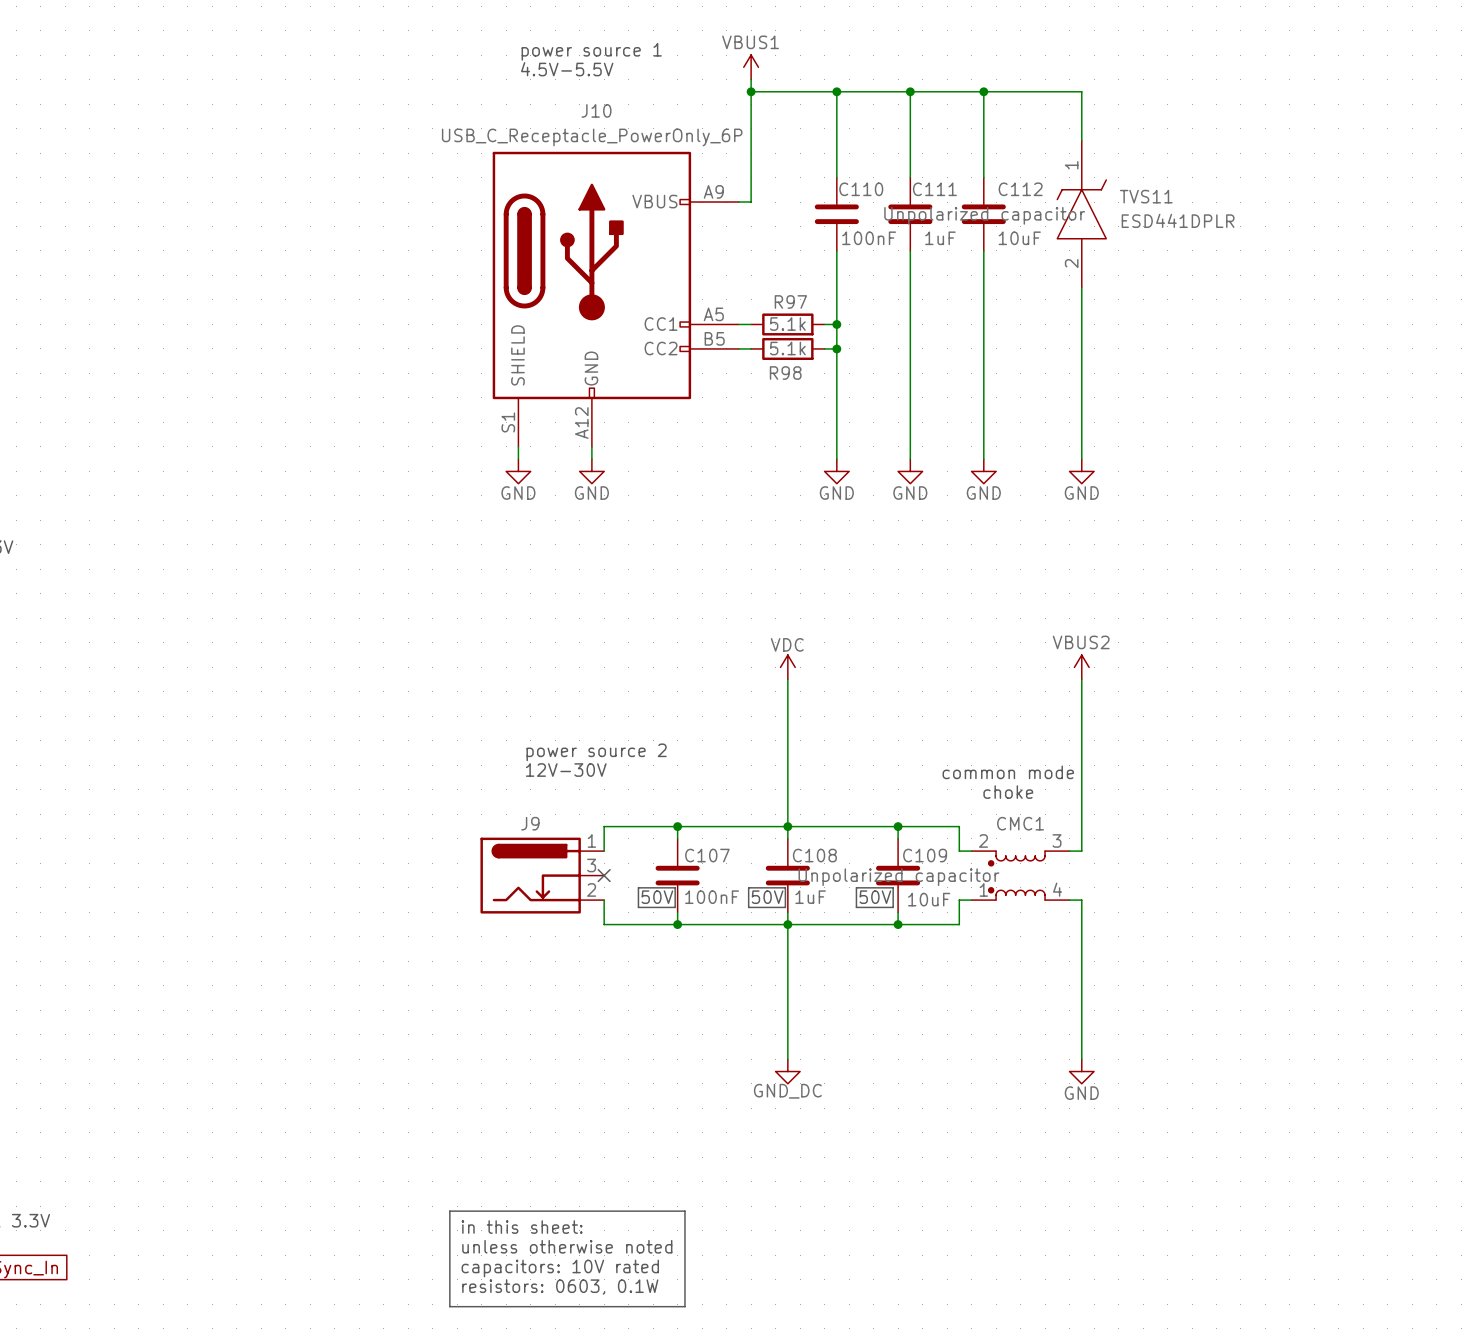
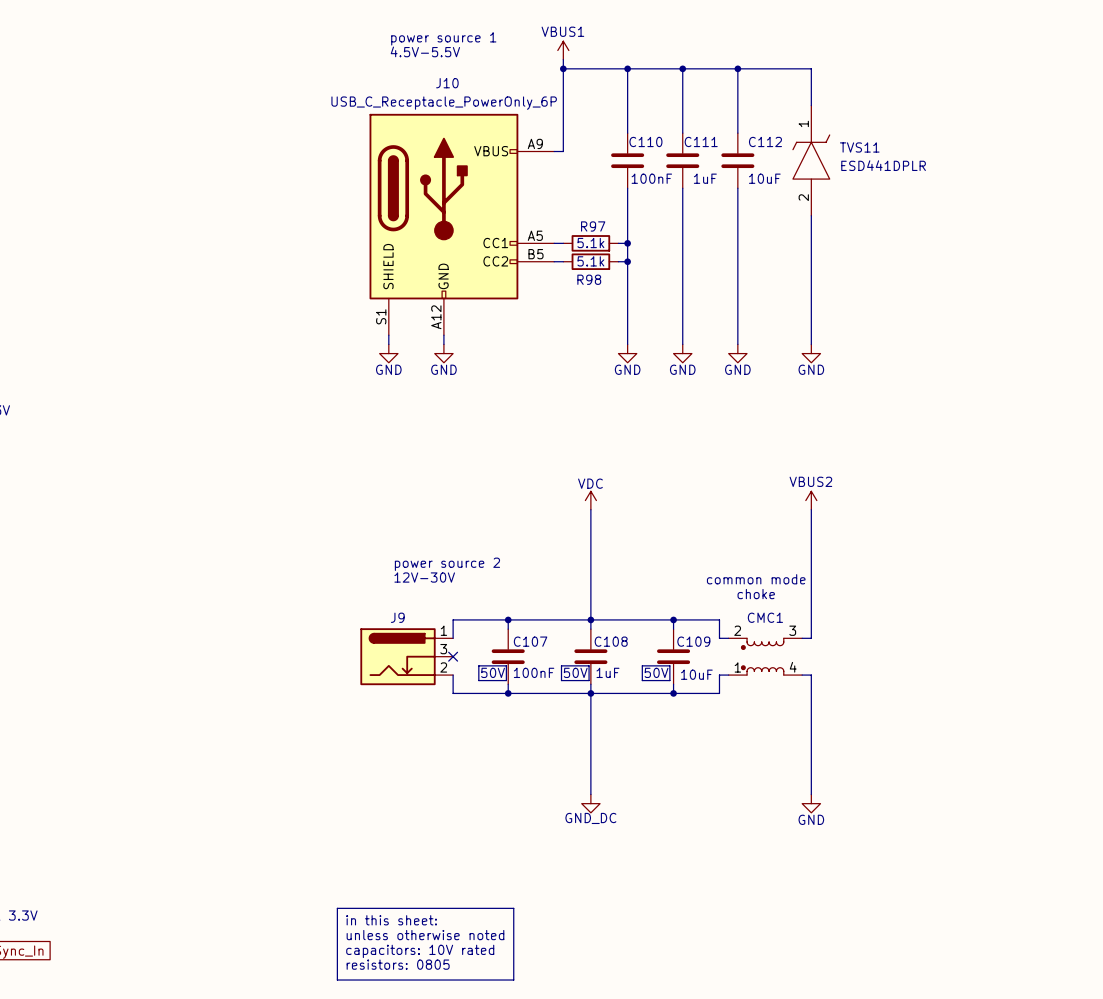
C112 text: Unpolarized capacitor (984, 215) -> none
C109 text: Unpolarized capacitor (898, 877) -> none
text: resistors: 0603, 0.1W (560, 1287) -> resistors: 0805 (398, 964)

